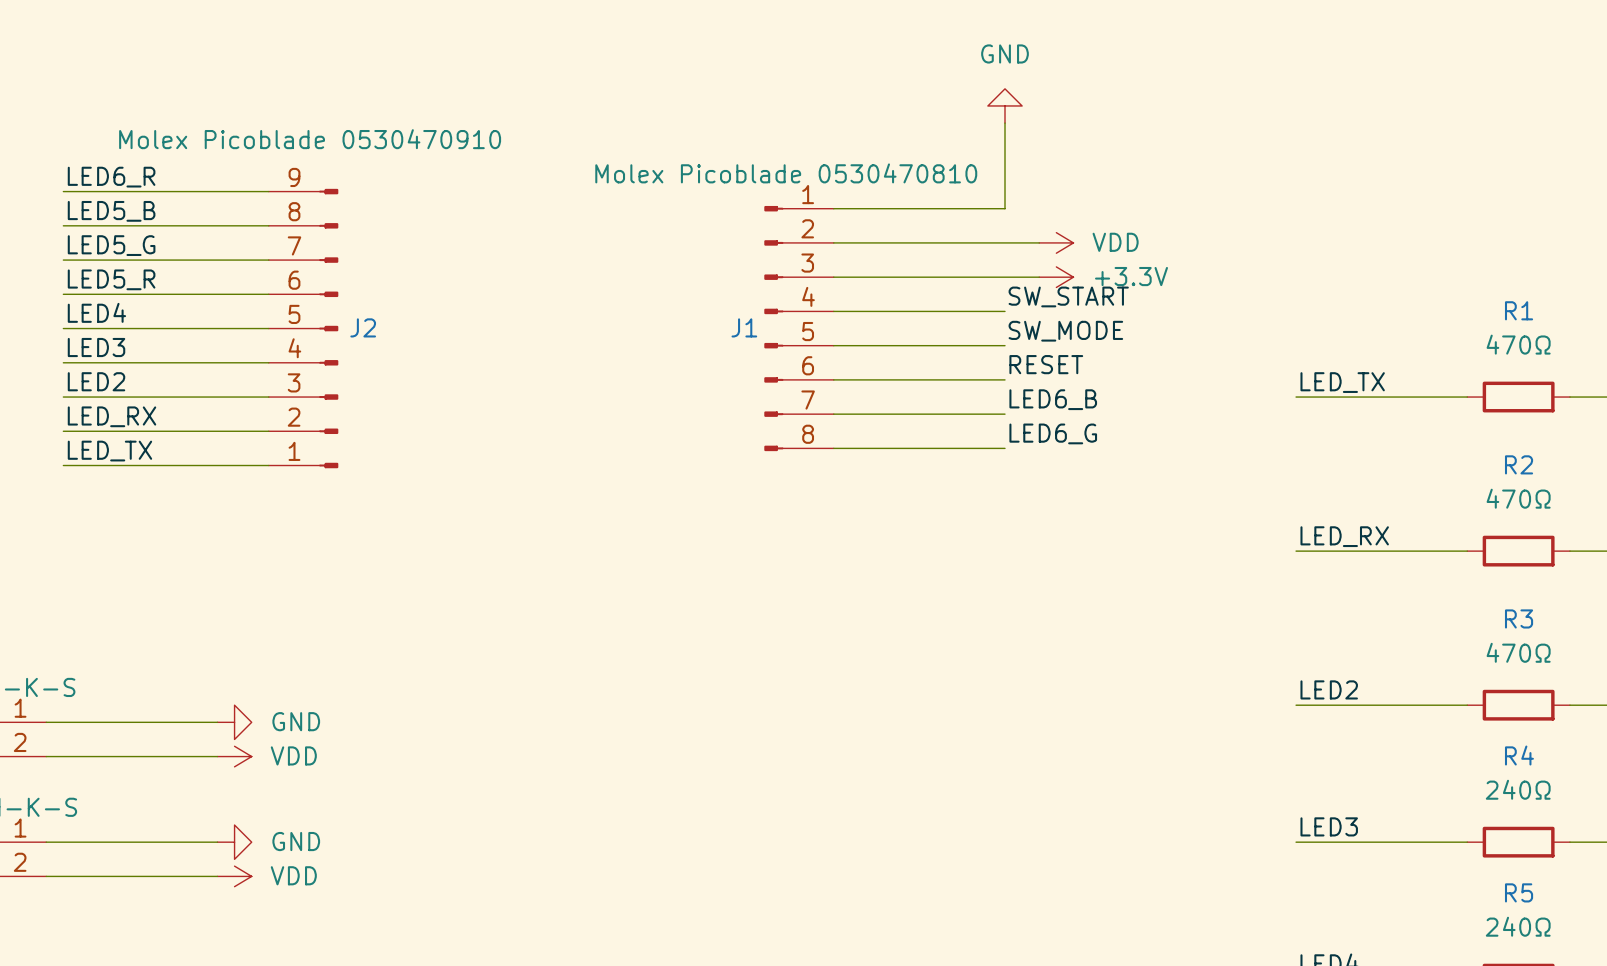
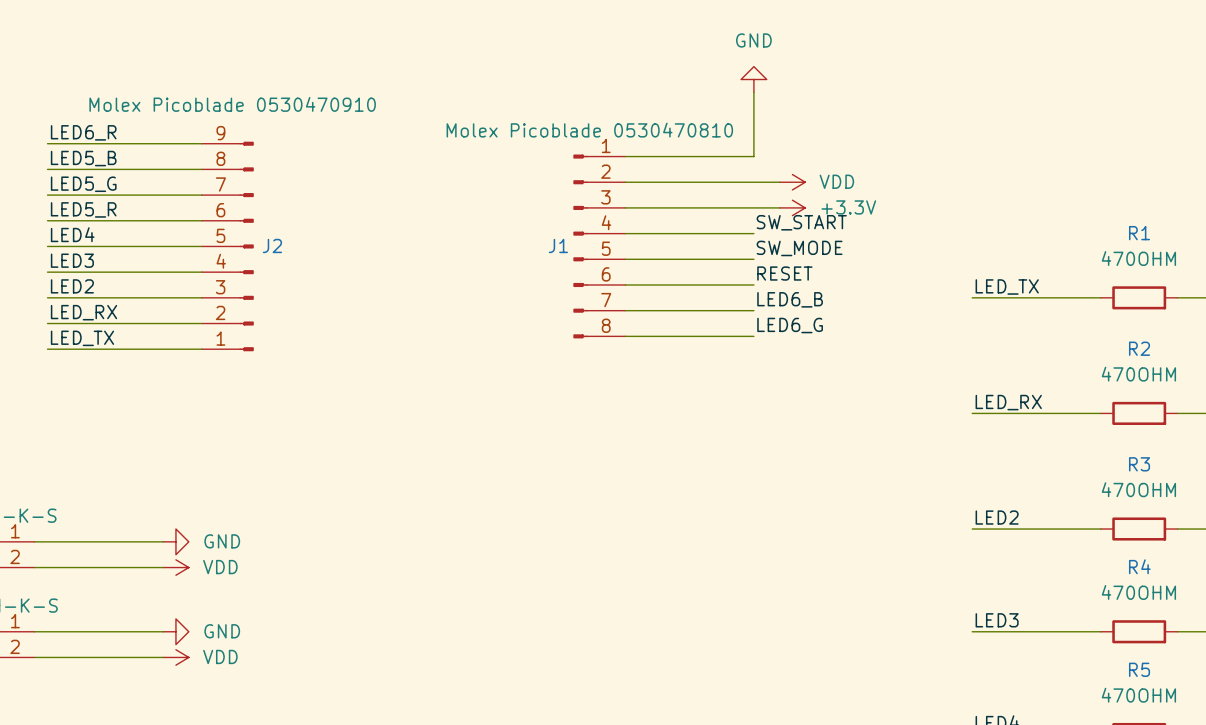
R1 value: 470Ω (1518, 344) -> 470OHM (1138, 258)
R2 value: 470Ω (1518, 498) -> 470OHM (1138, 374)
R3 value: 470Ω (1518, 652) -> 470OHM (1138, 489)
R4 value: 240Ω (1518, 789) -> 470OHM (1138, 592)
R5 value: 240Ω (1518, 926) -> 470OHM (1138, 695)

